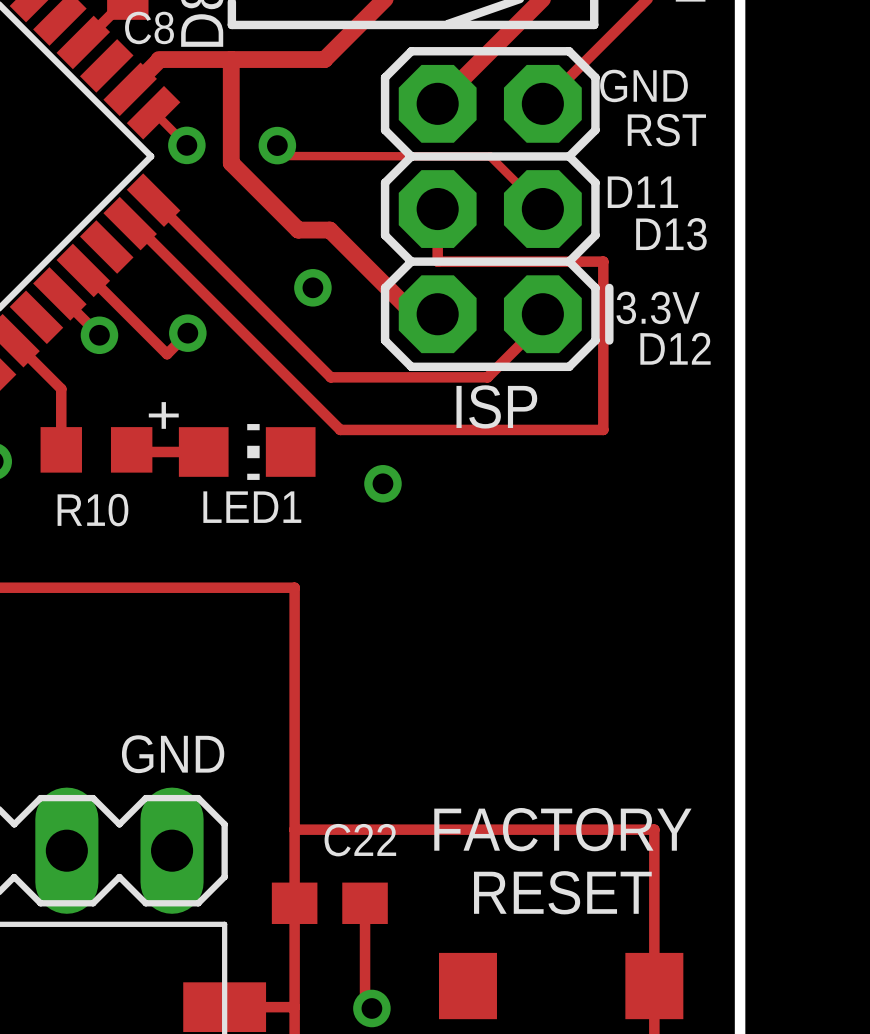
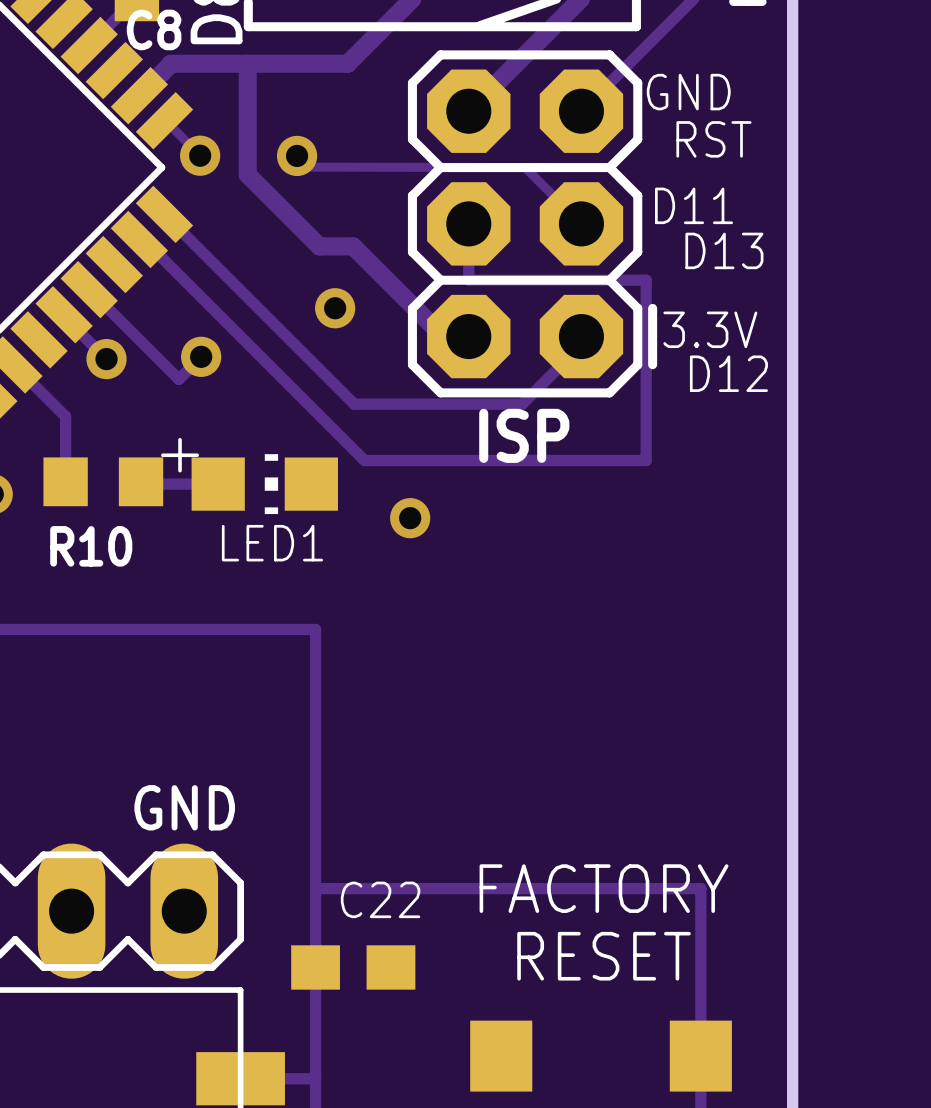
track: (365, 903) (365, 1008) (371, 1008) -> none
via: (371, 1008) -> none

